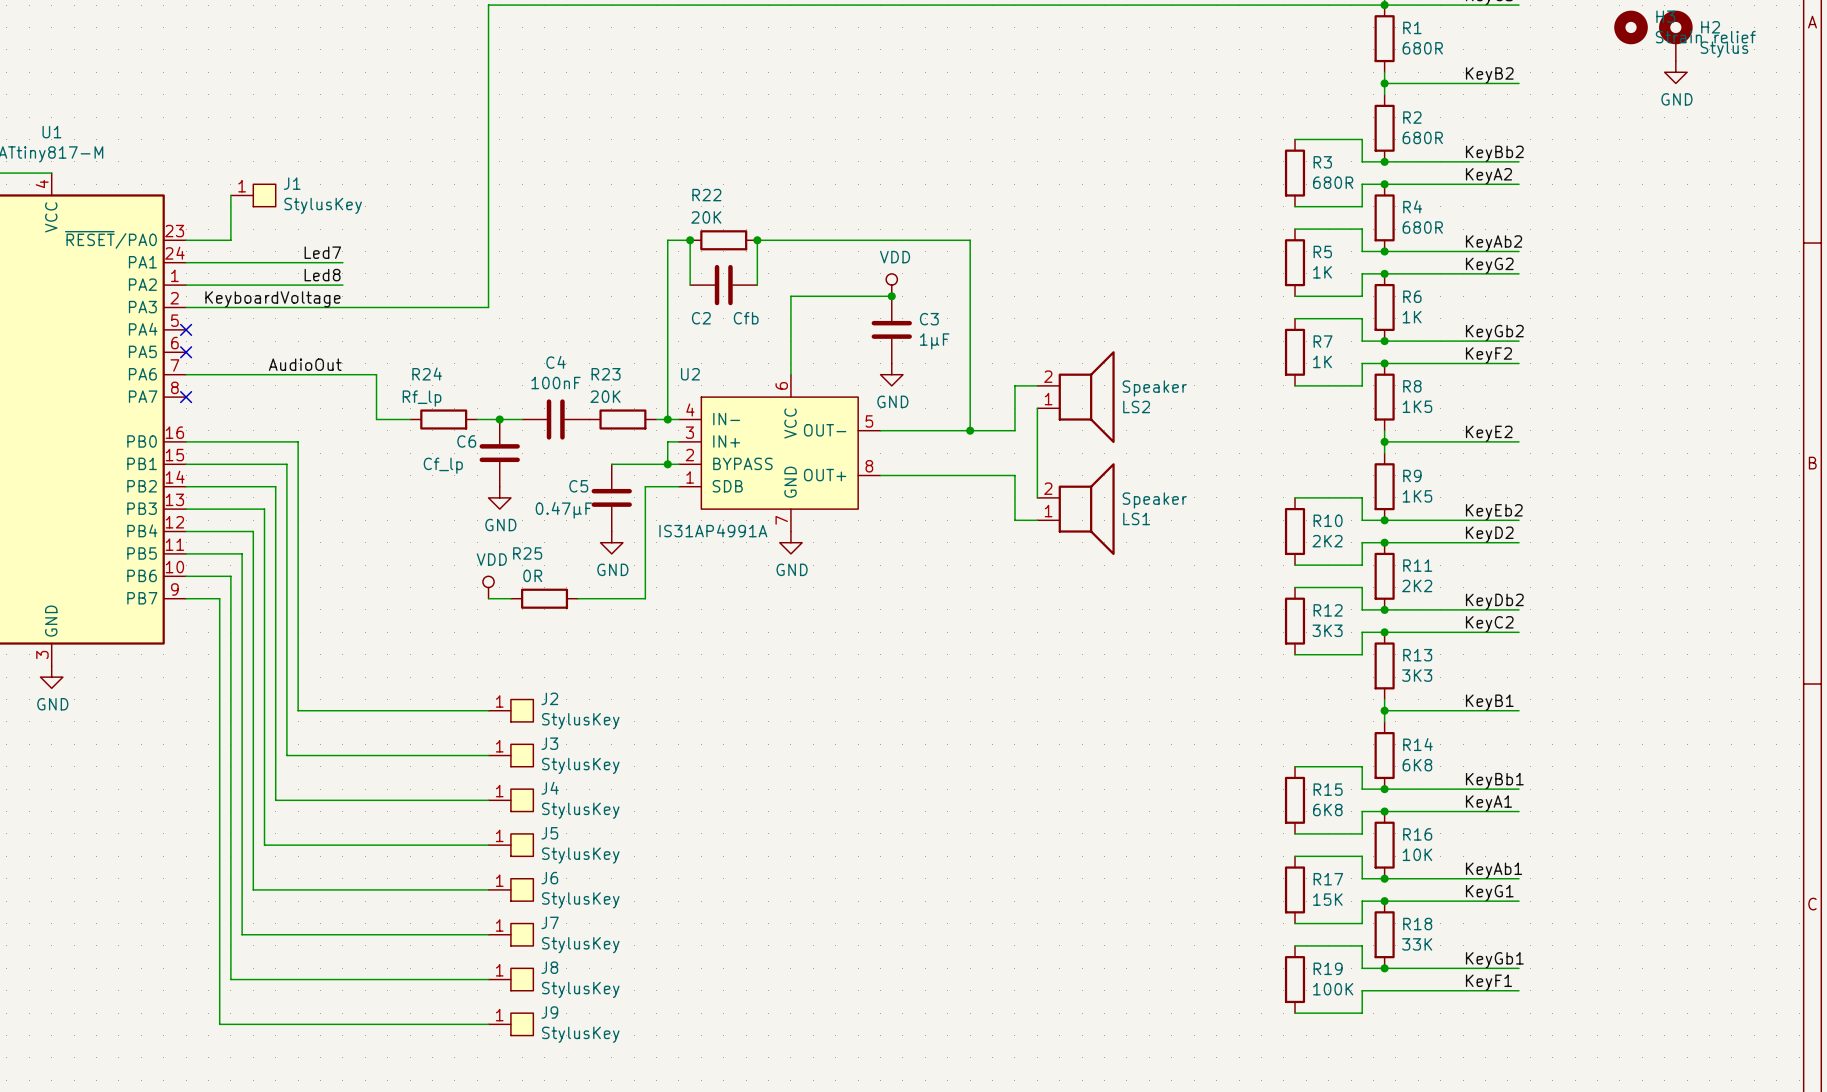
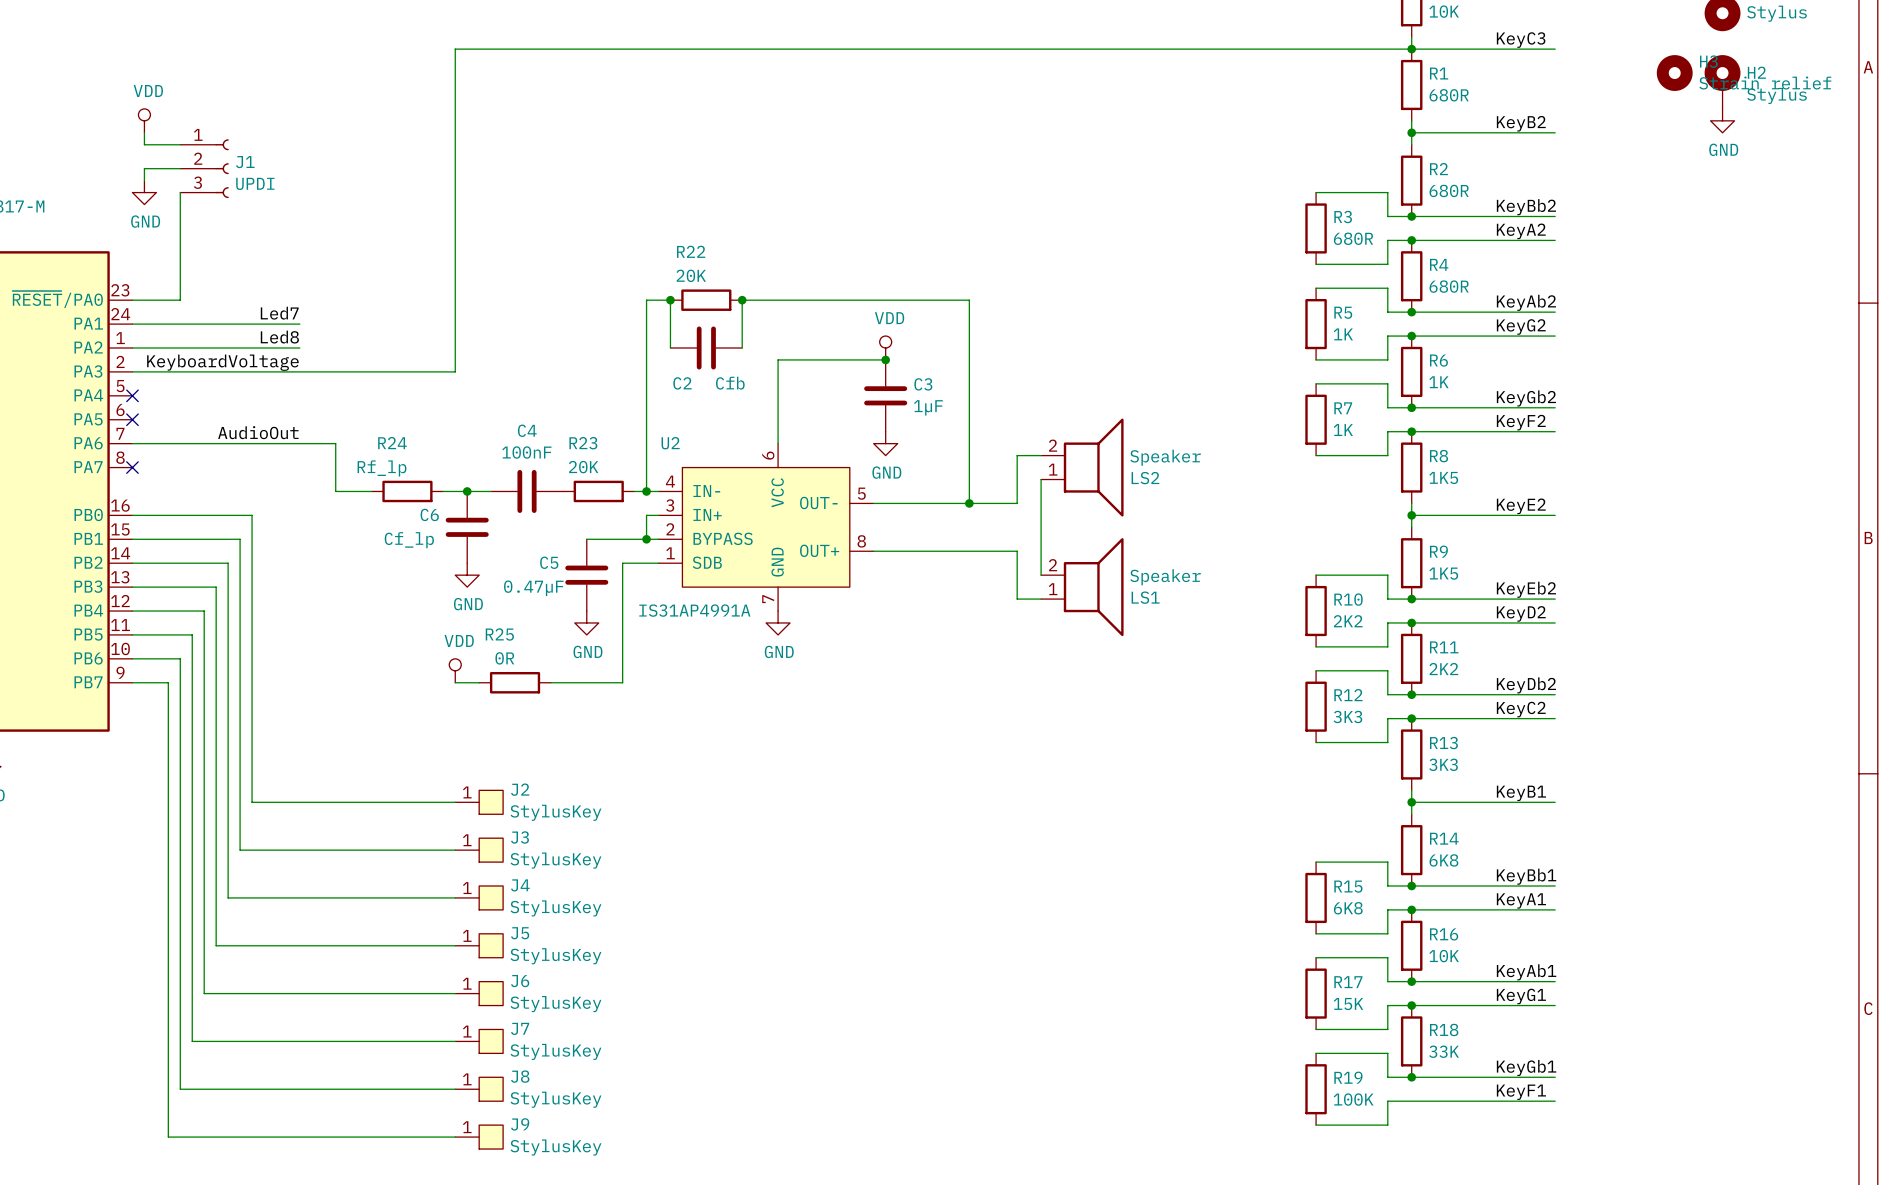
power symbol: none -> VDD (144, 120)
wire: none -> (144, 132) (144, 144) (180, 144)
wire: none -> (180, 168) (144, 168) (144, 180)
power symbol: none -> GND (144, 192)
wire: none -> (180, 192) (180, 252)
J1 symbol: [230, 184, 276, 207] -> [180, 139, 229, 199]
J1 value: StylusKey (323, 205) -> UPDI (255, 183)

